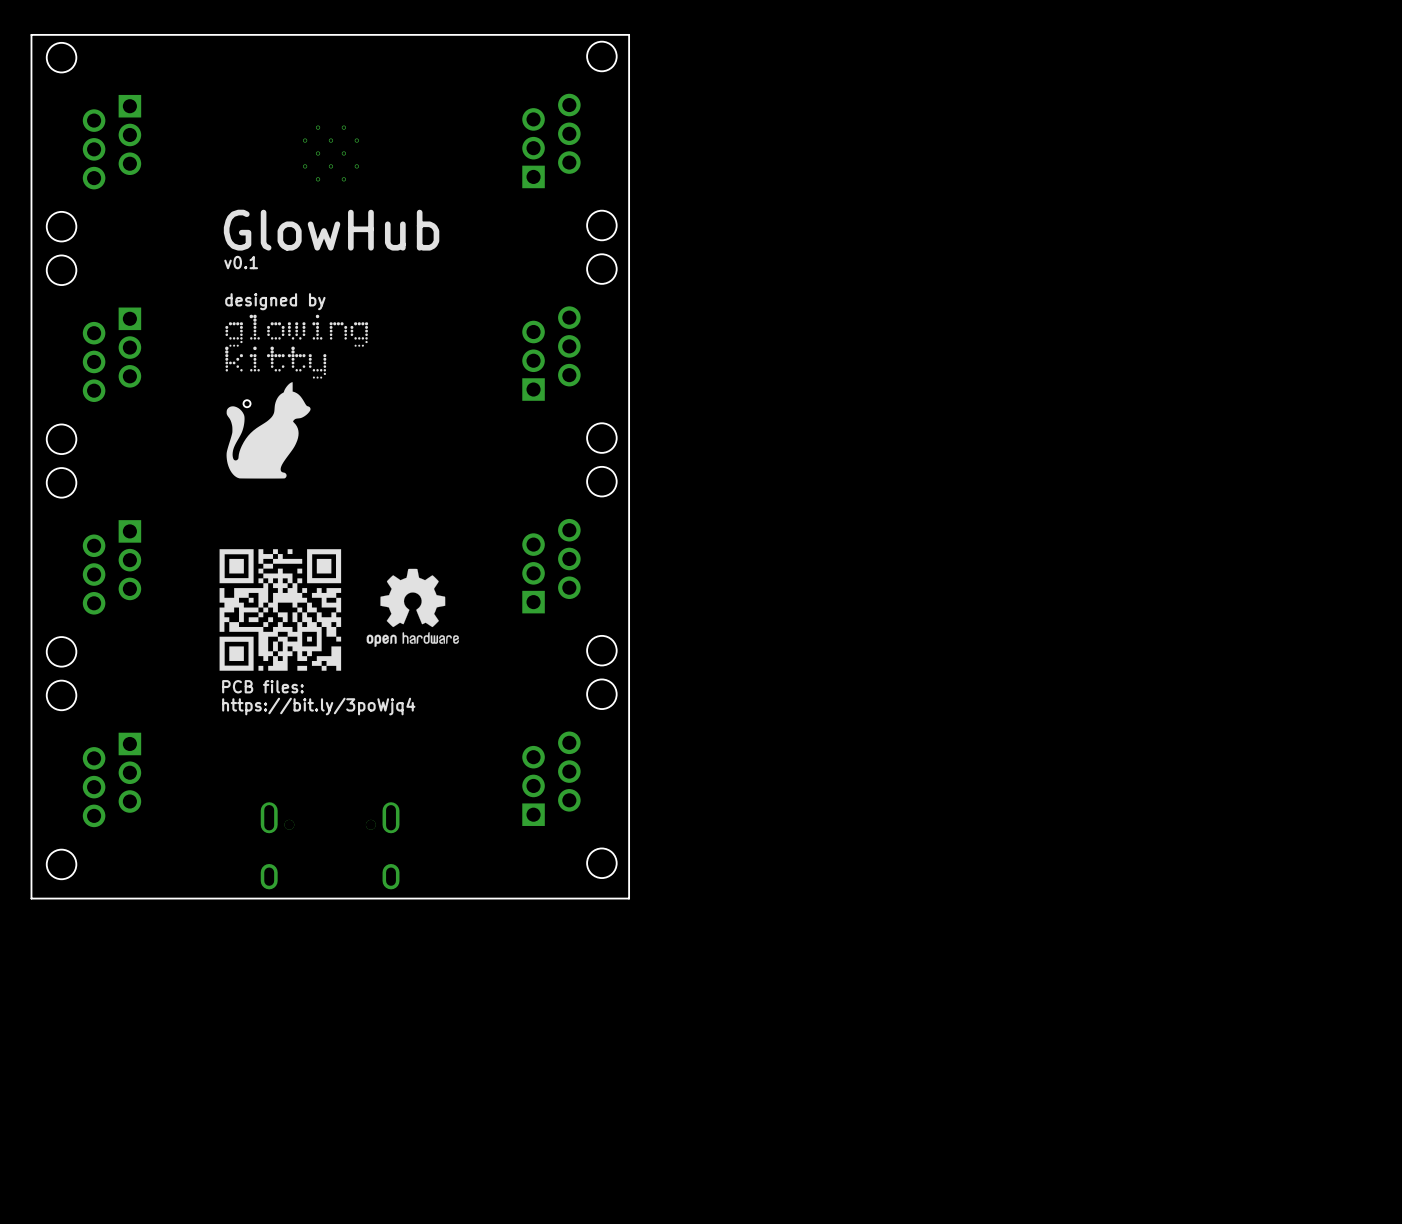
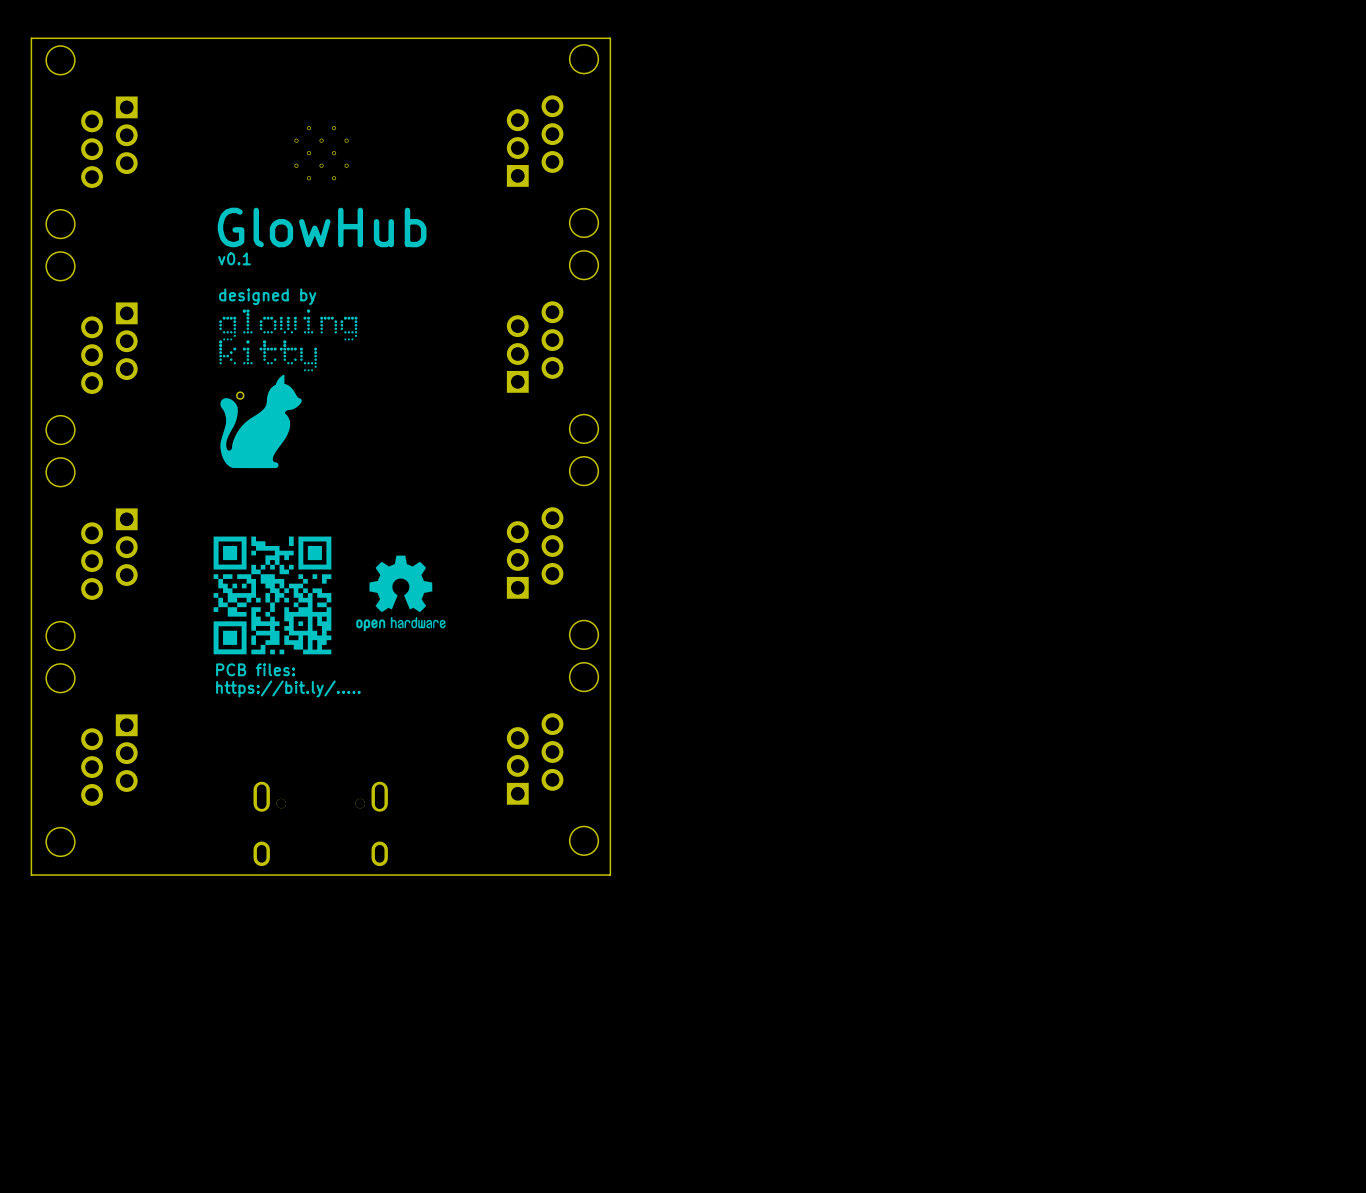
drawing shape: [219, 549, 342, 671] -> [213, 536, 332, 655]
text: https://bit.ly/3poWjq4 (318, 706) -> https://bit.ly/..... (288, 688)

